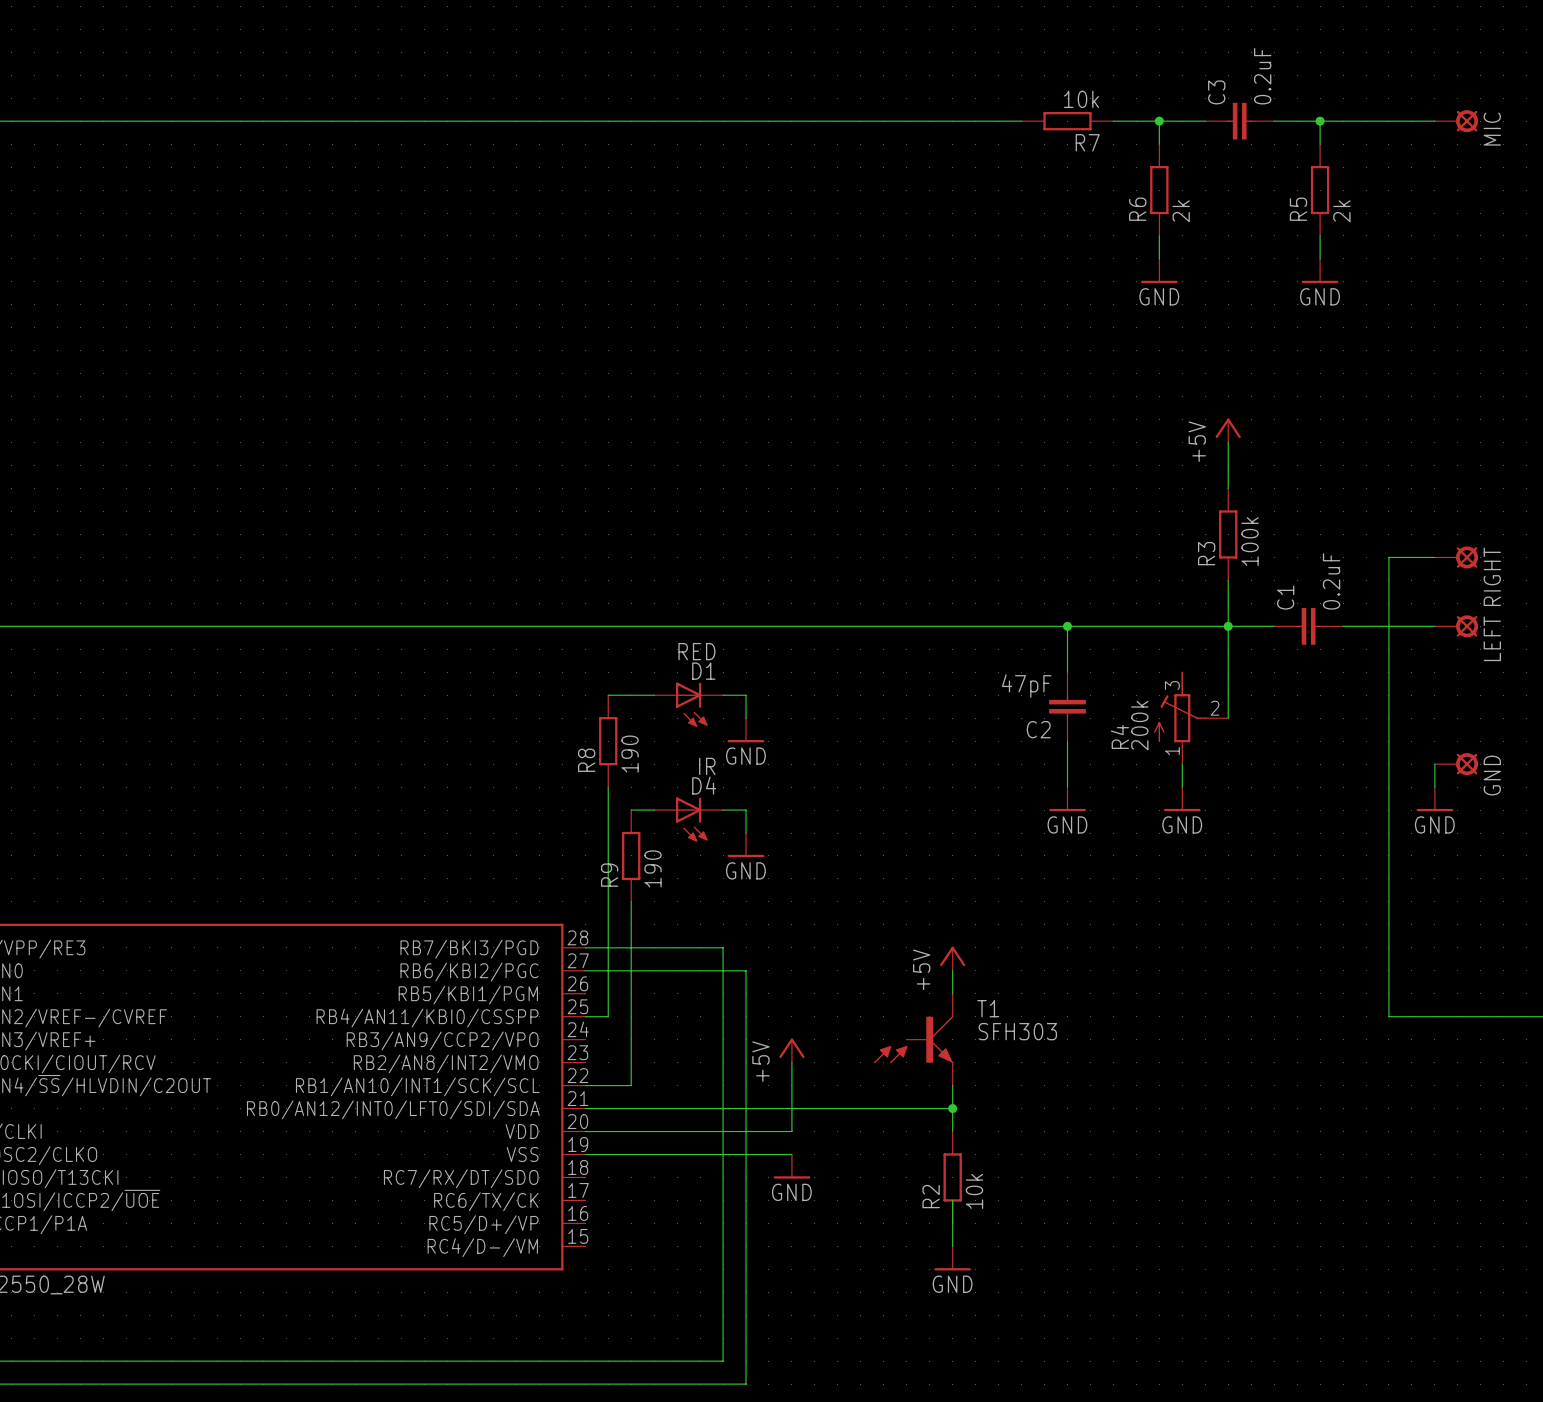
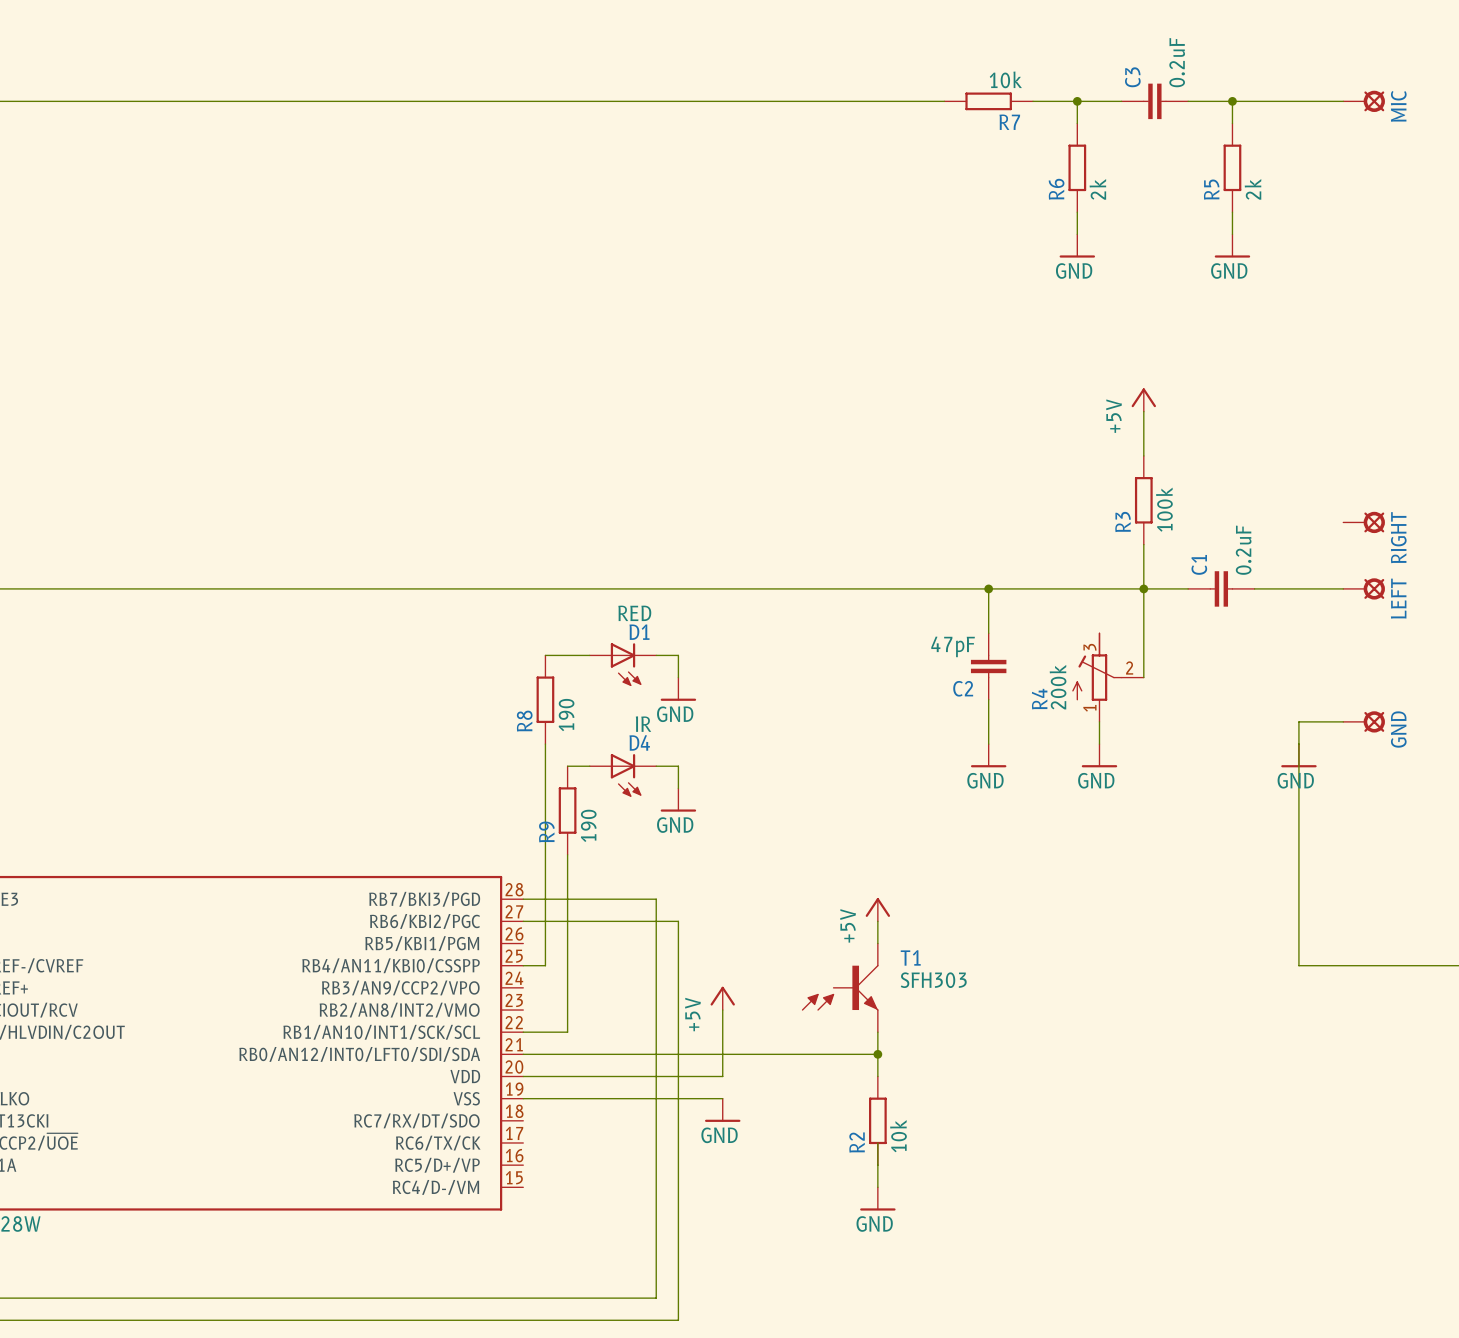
wire: (1434, 557) (1388, 557) (1388, 764) -> none
wire: (1434, 764) (1434, 787) -> (1343, 721) (1298, 721)
power symbol position: GND (1434, 799) -> GND (1298, 755)

